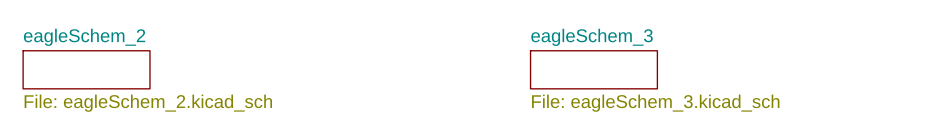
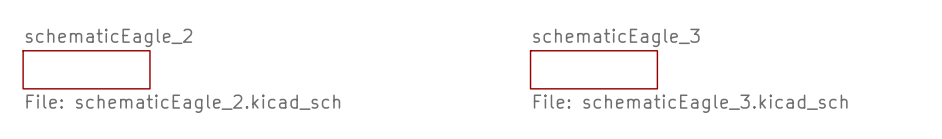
sheet eagleSchem_2 name: eagleSchem_2 (84, 37) -> schematicEagle_2 (108, 37)
sheet eagleSchem_3 name: eagleSchem_3 (592, 37) -> schematicEagle_3 (616, 37)
sheet eagleSchem_2 value: File: eagleSchem_2.kicad_sch (148, 103) -> File: schematicEagle_2.kicad_sch (183, 103)
sheet eagleSchem_3 value: File: eagleSchem_3.kicad_sch (655, 103) -> File: schematicEagle_3.kicad_sch (690, 103)

